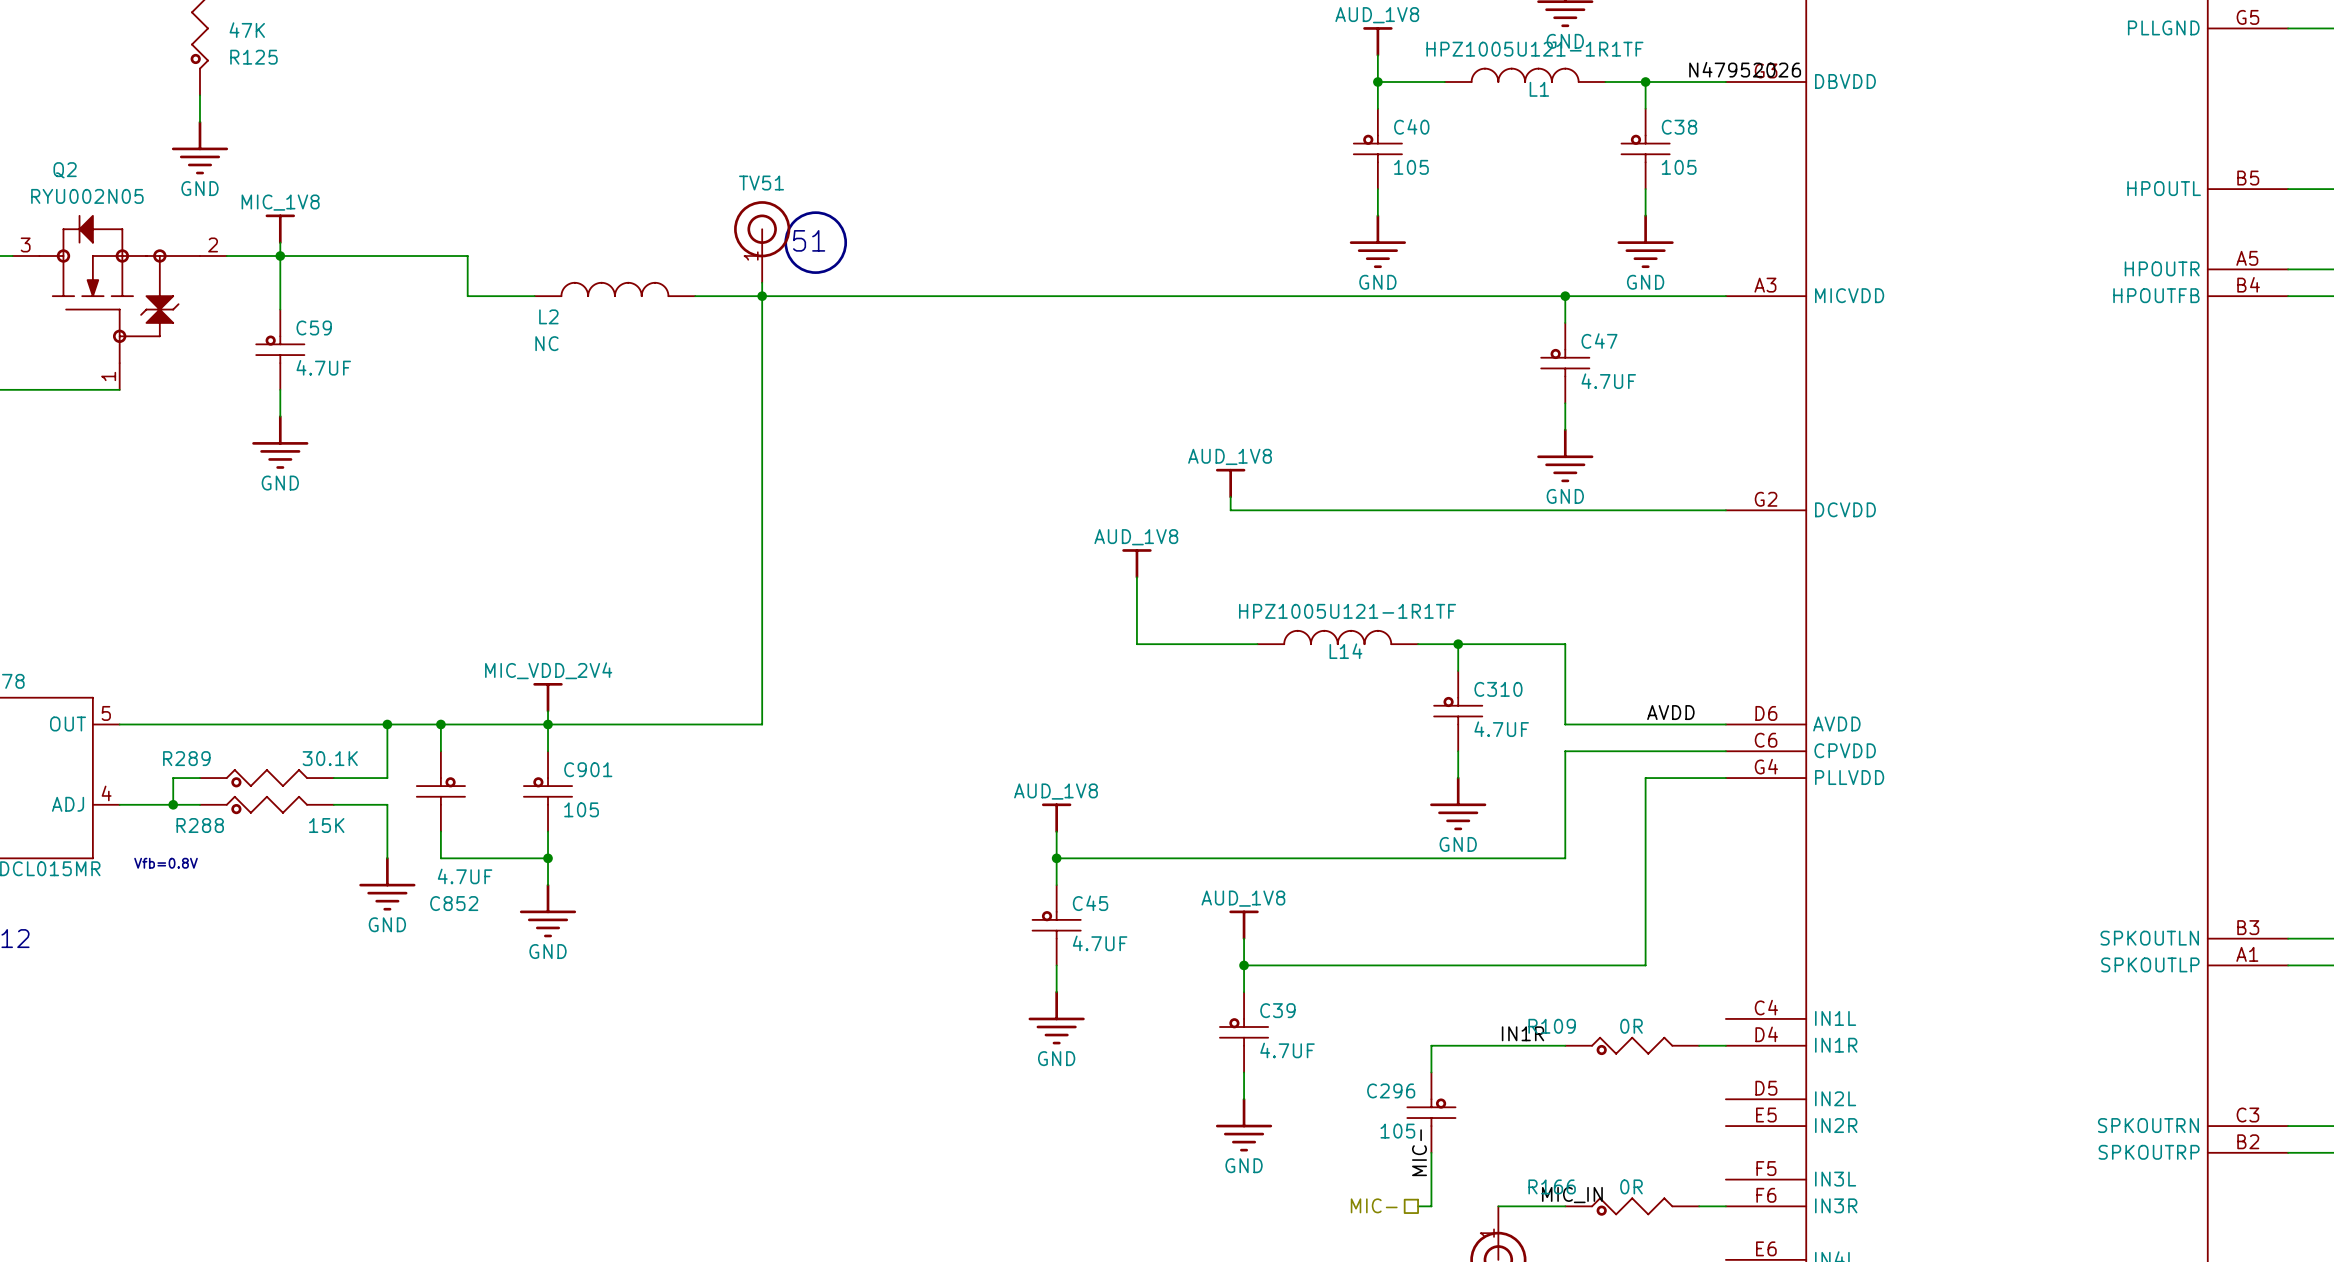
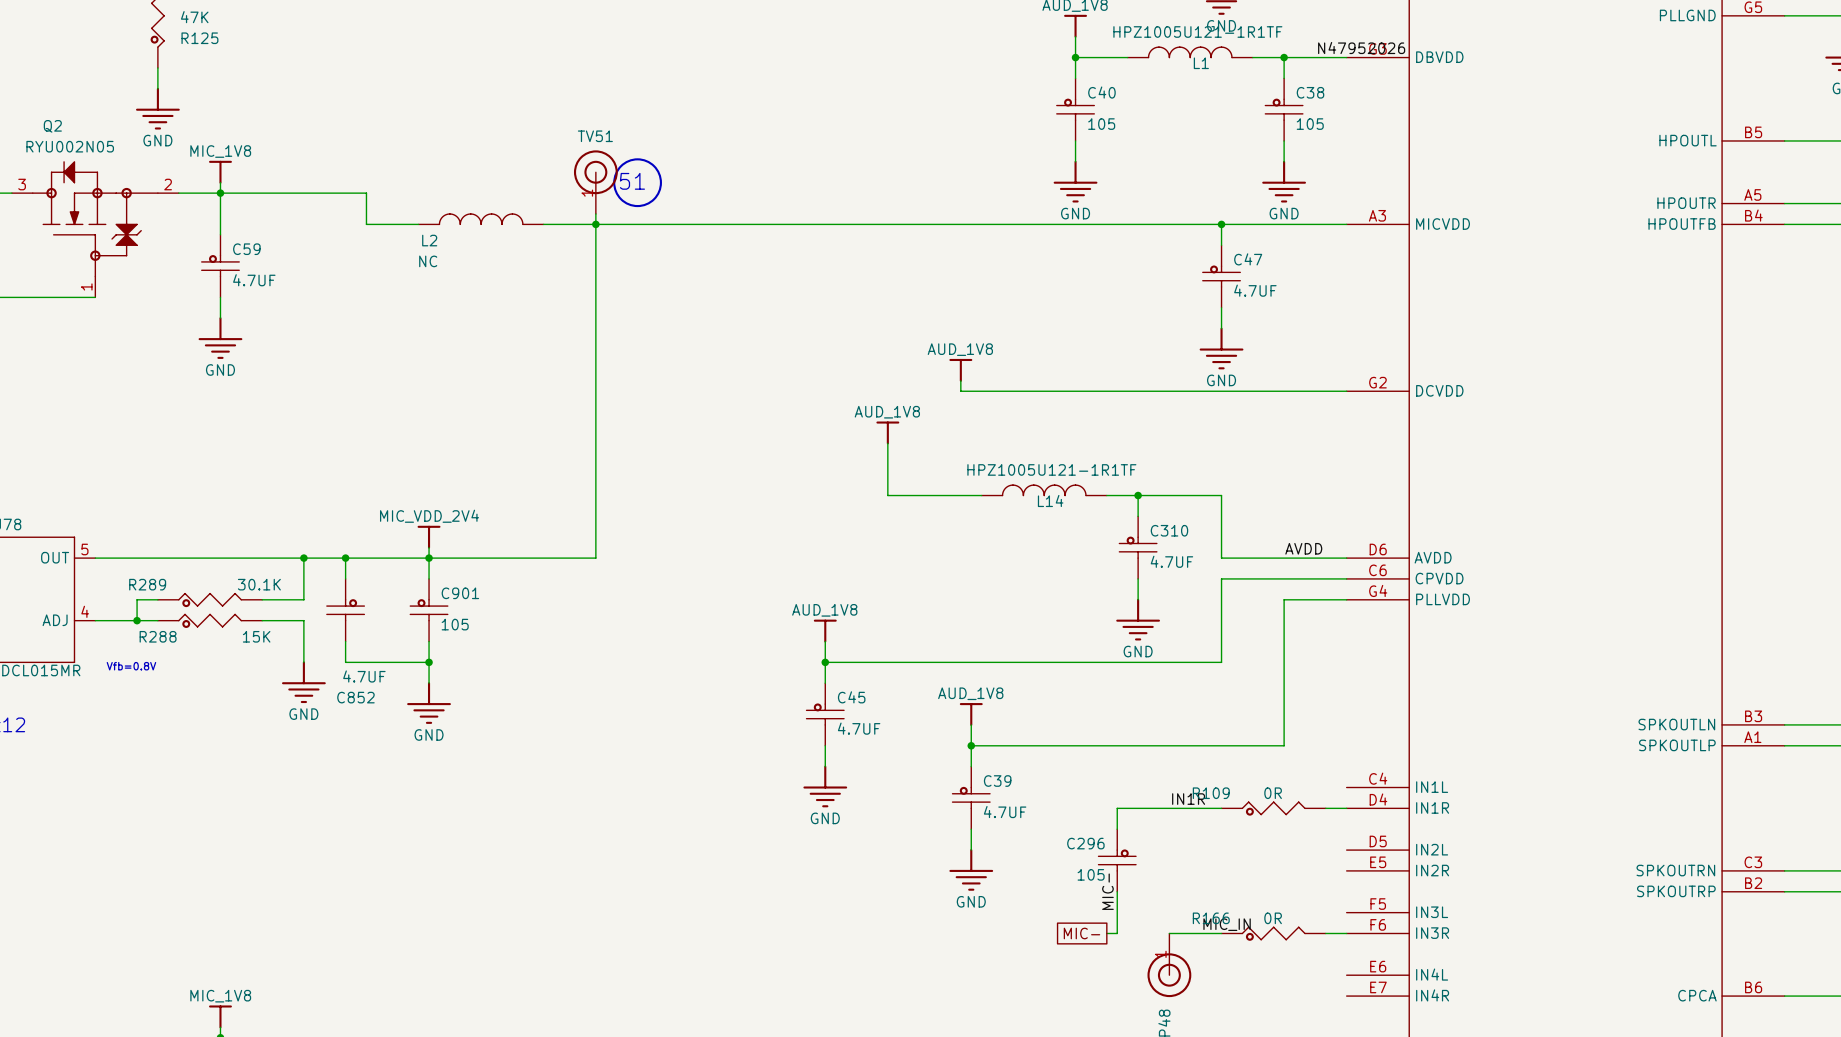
hierarchical label: MIC- (1374, 1205) -> none
global label: none -> MIC- (1081, 933)

